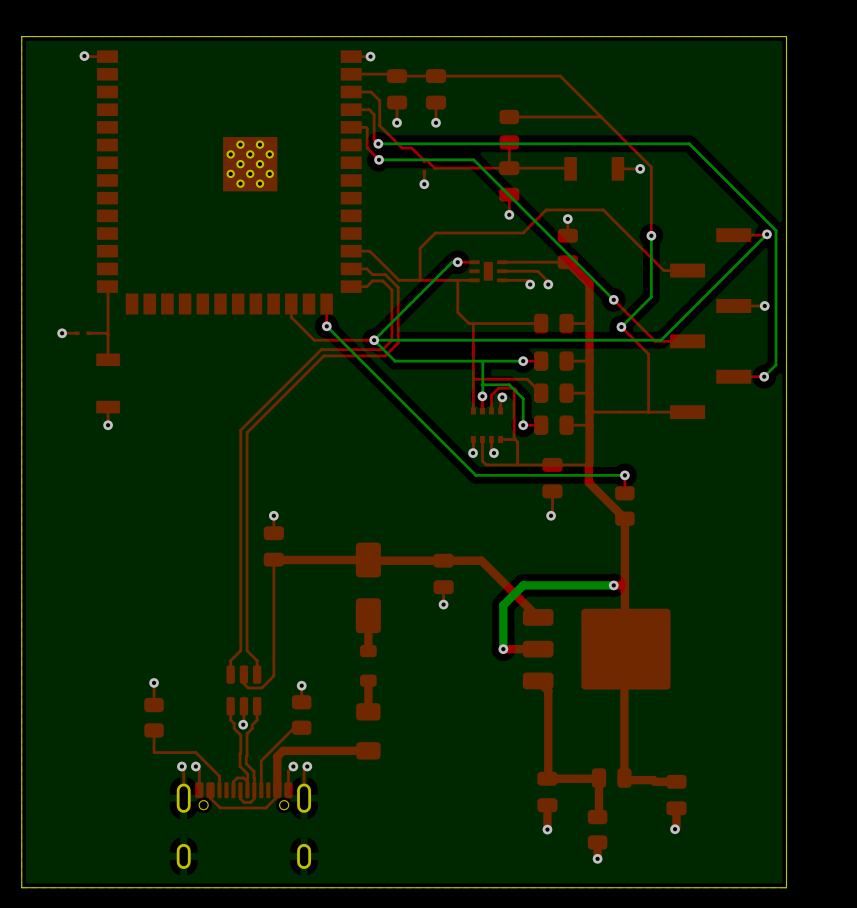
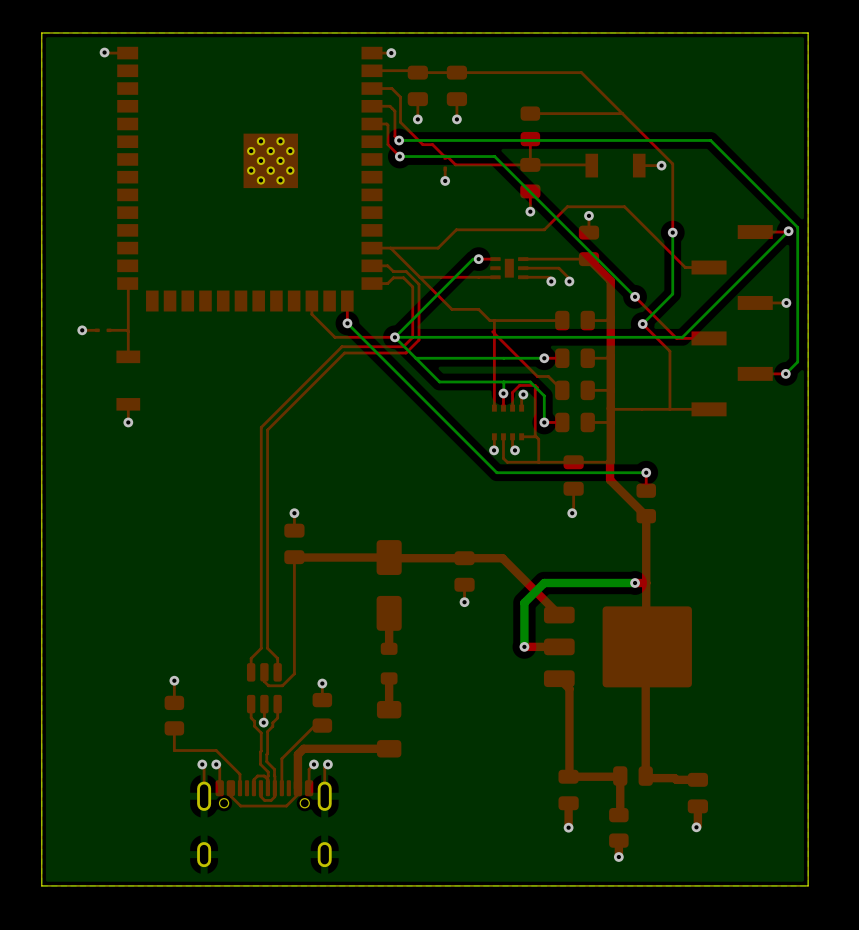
top track: (420, 248) (420, 280) -> (441, 245) (438, 248) (390, 248)
top track: (457, 280) (457, 312) -> (419, 277) (451, 309) (478, 309)
bottom track: (482, 361) (482, 384) -> (415, 358) (439, 381) (503, 381)
top track: (527, 379) (473, 379) -> (548, 376) (537, 376) (492, 331)

